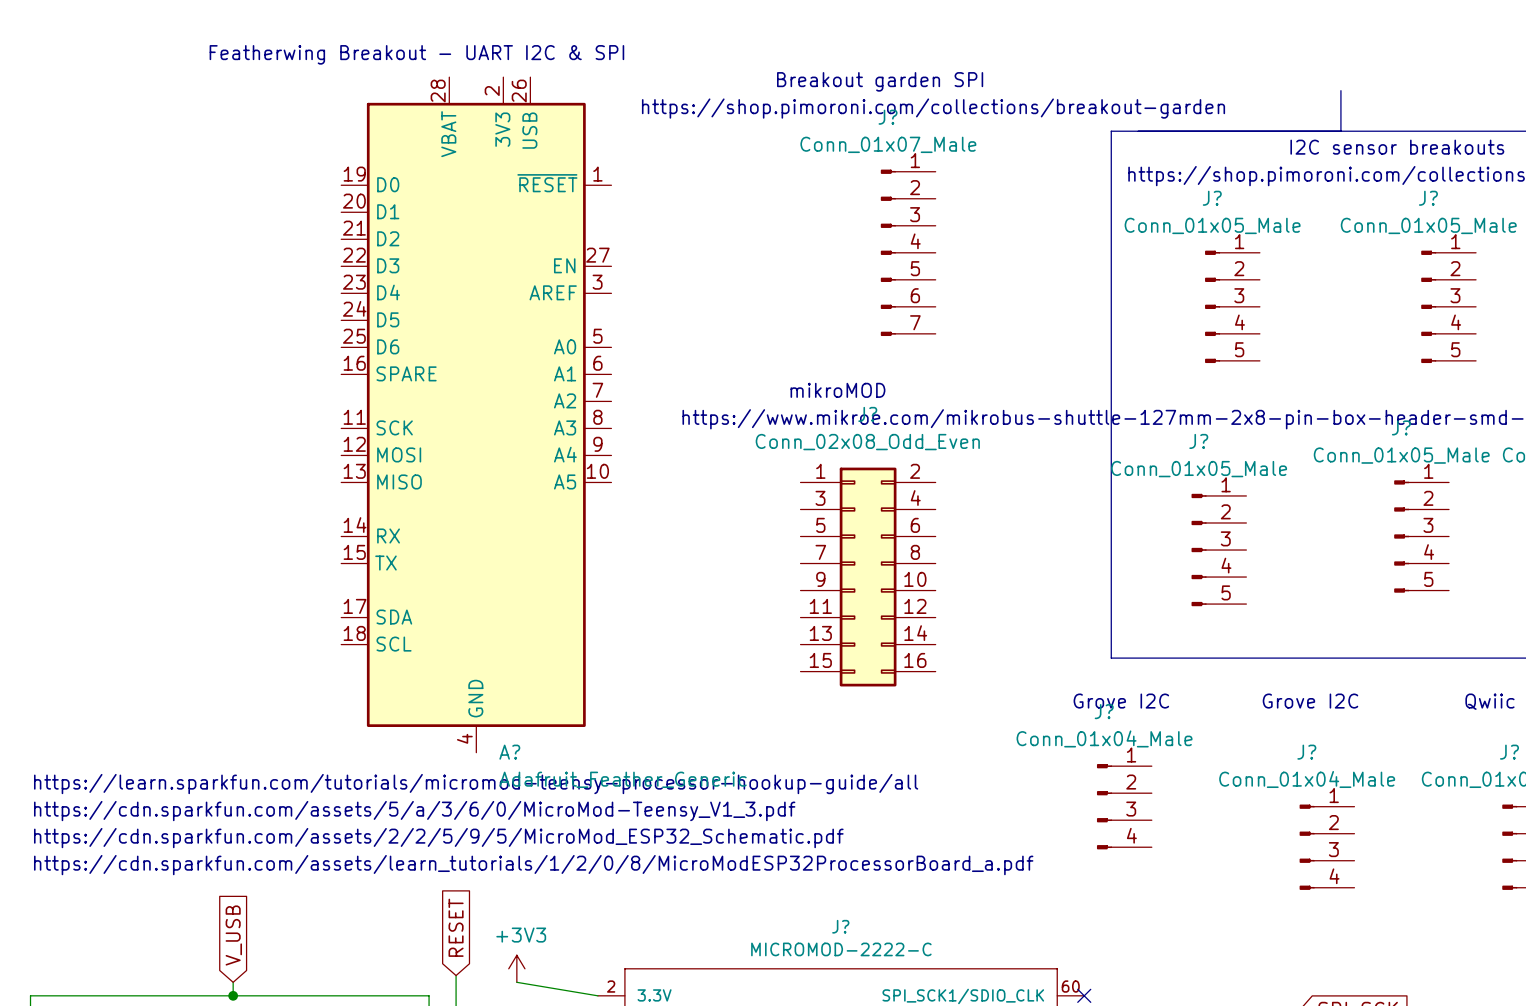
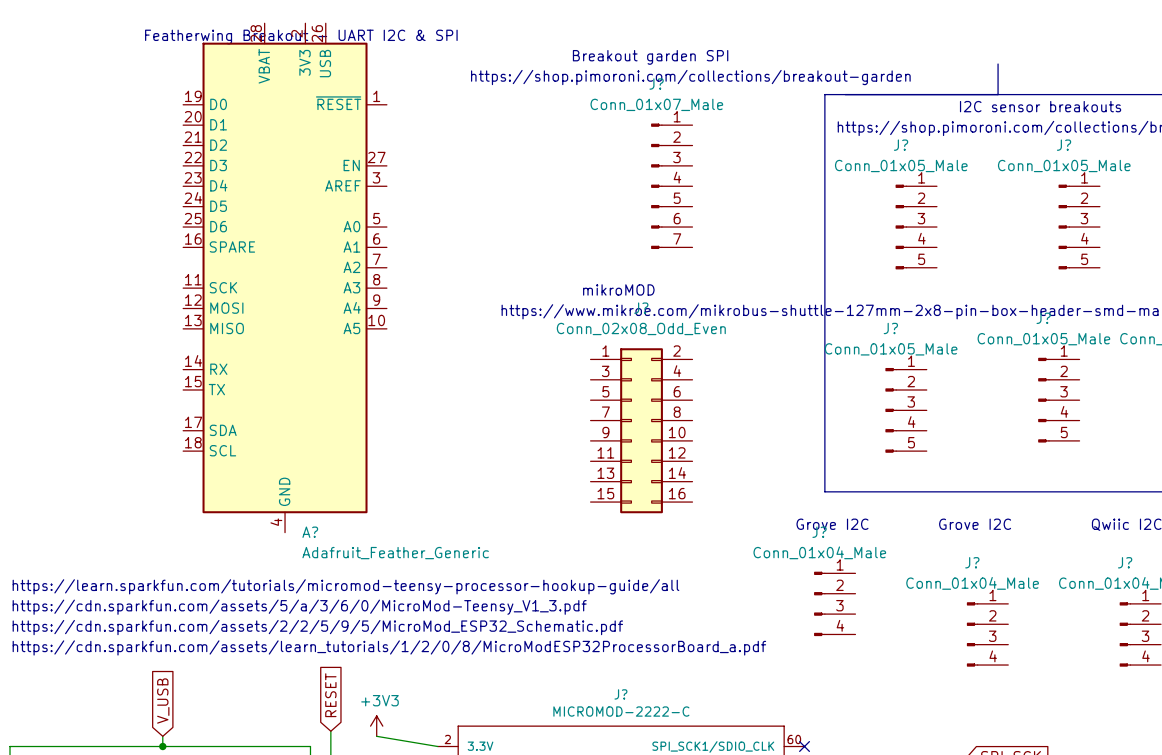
A? position: (476, 414) -> (285, 277)

